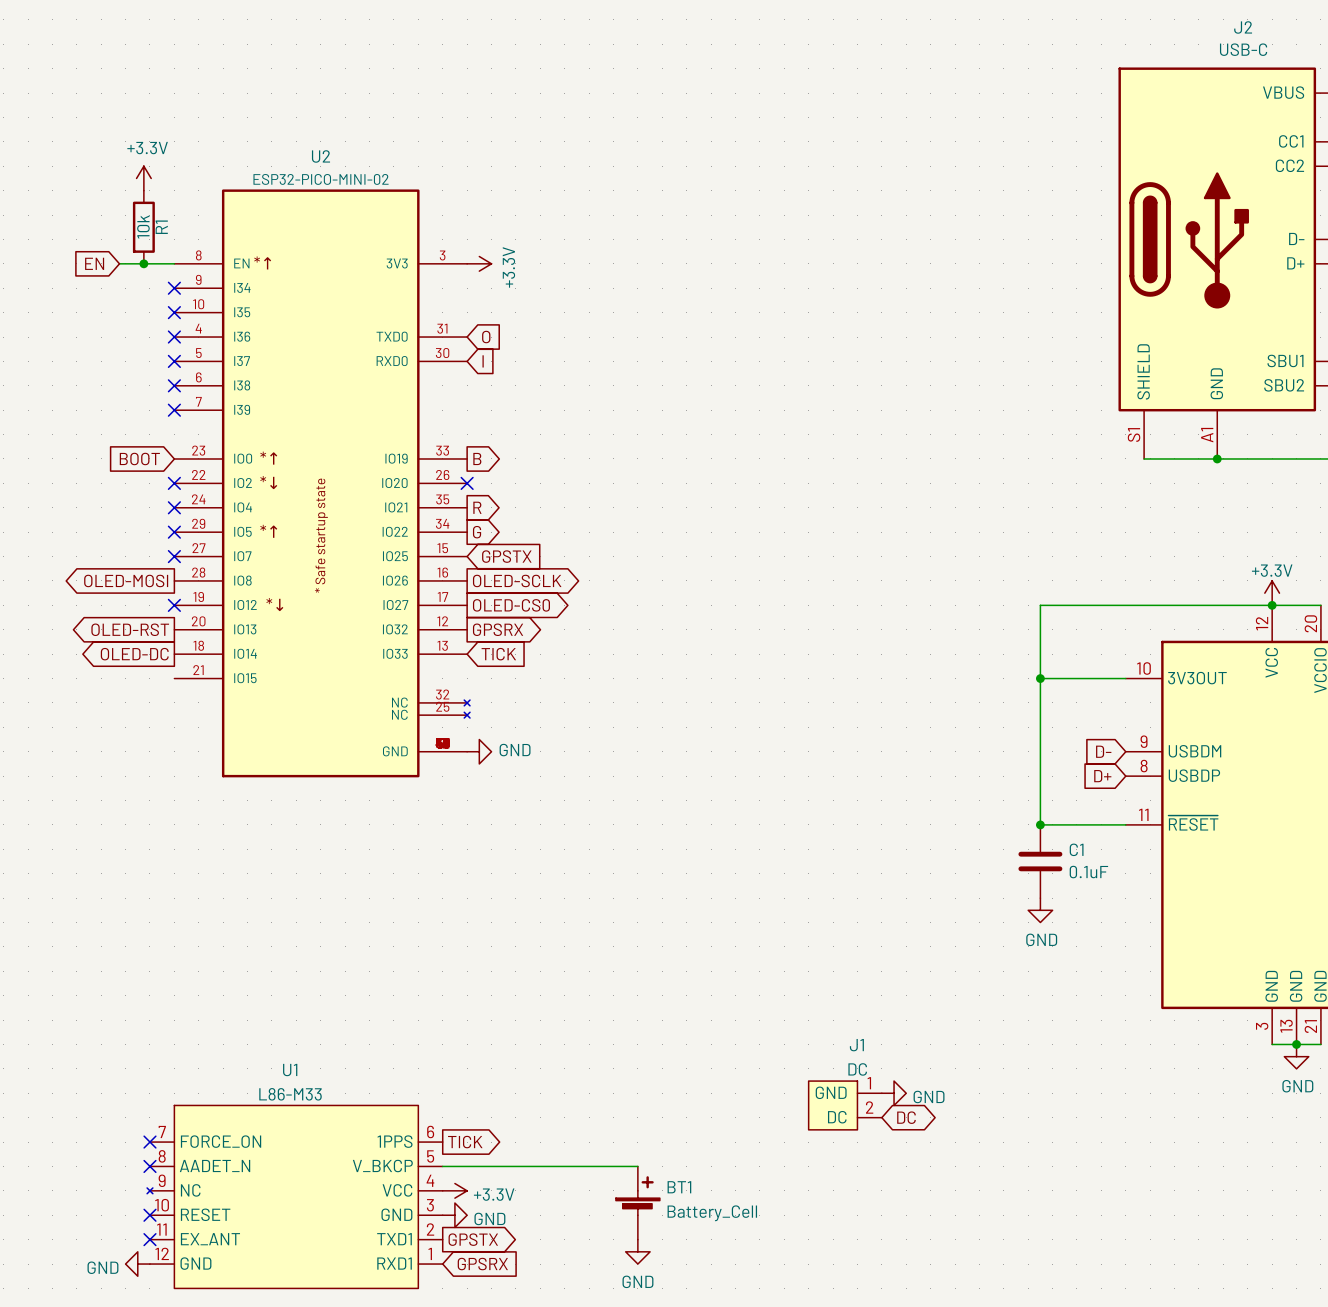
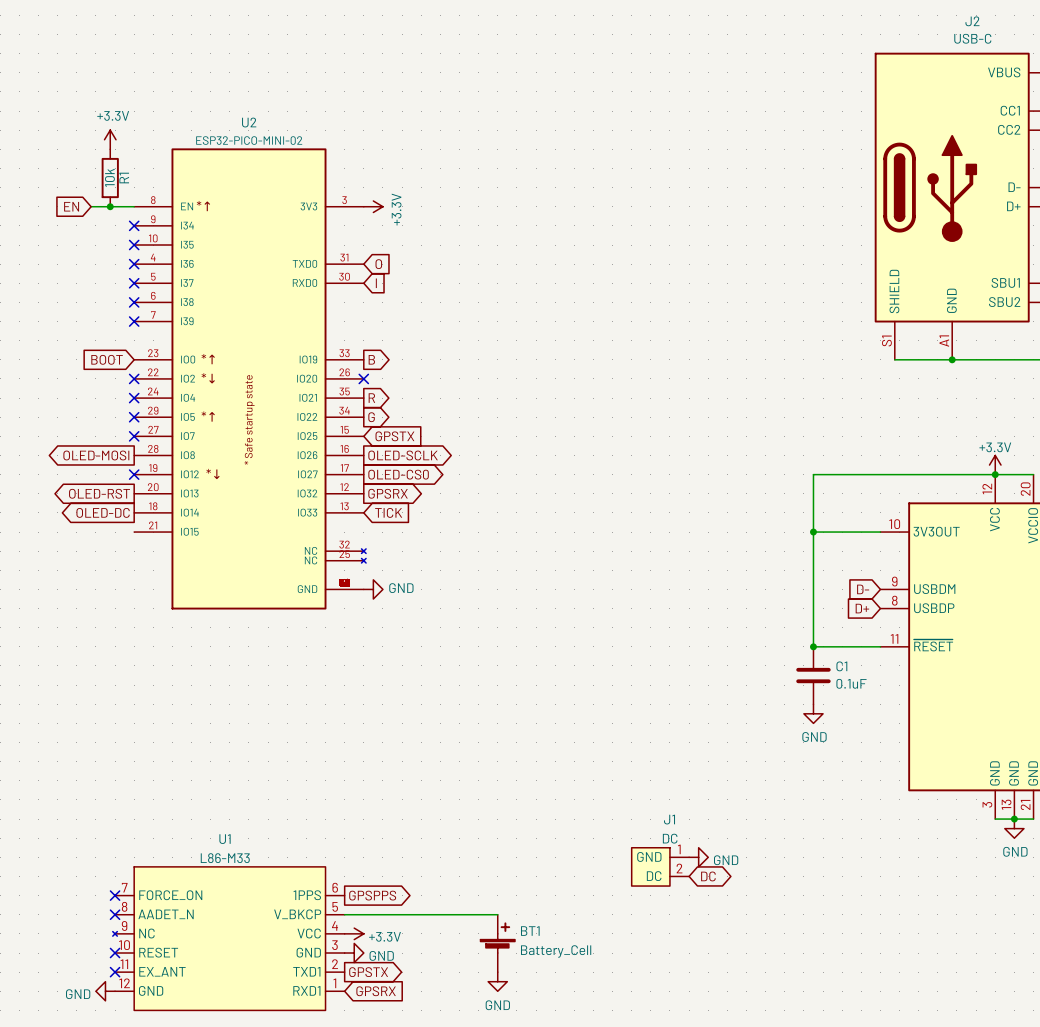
global label: TICK (465, 1142) -> GPSPPS (372, 895)

